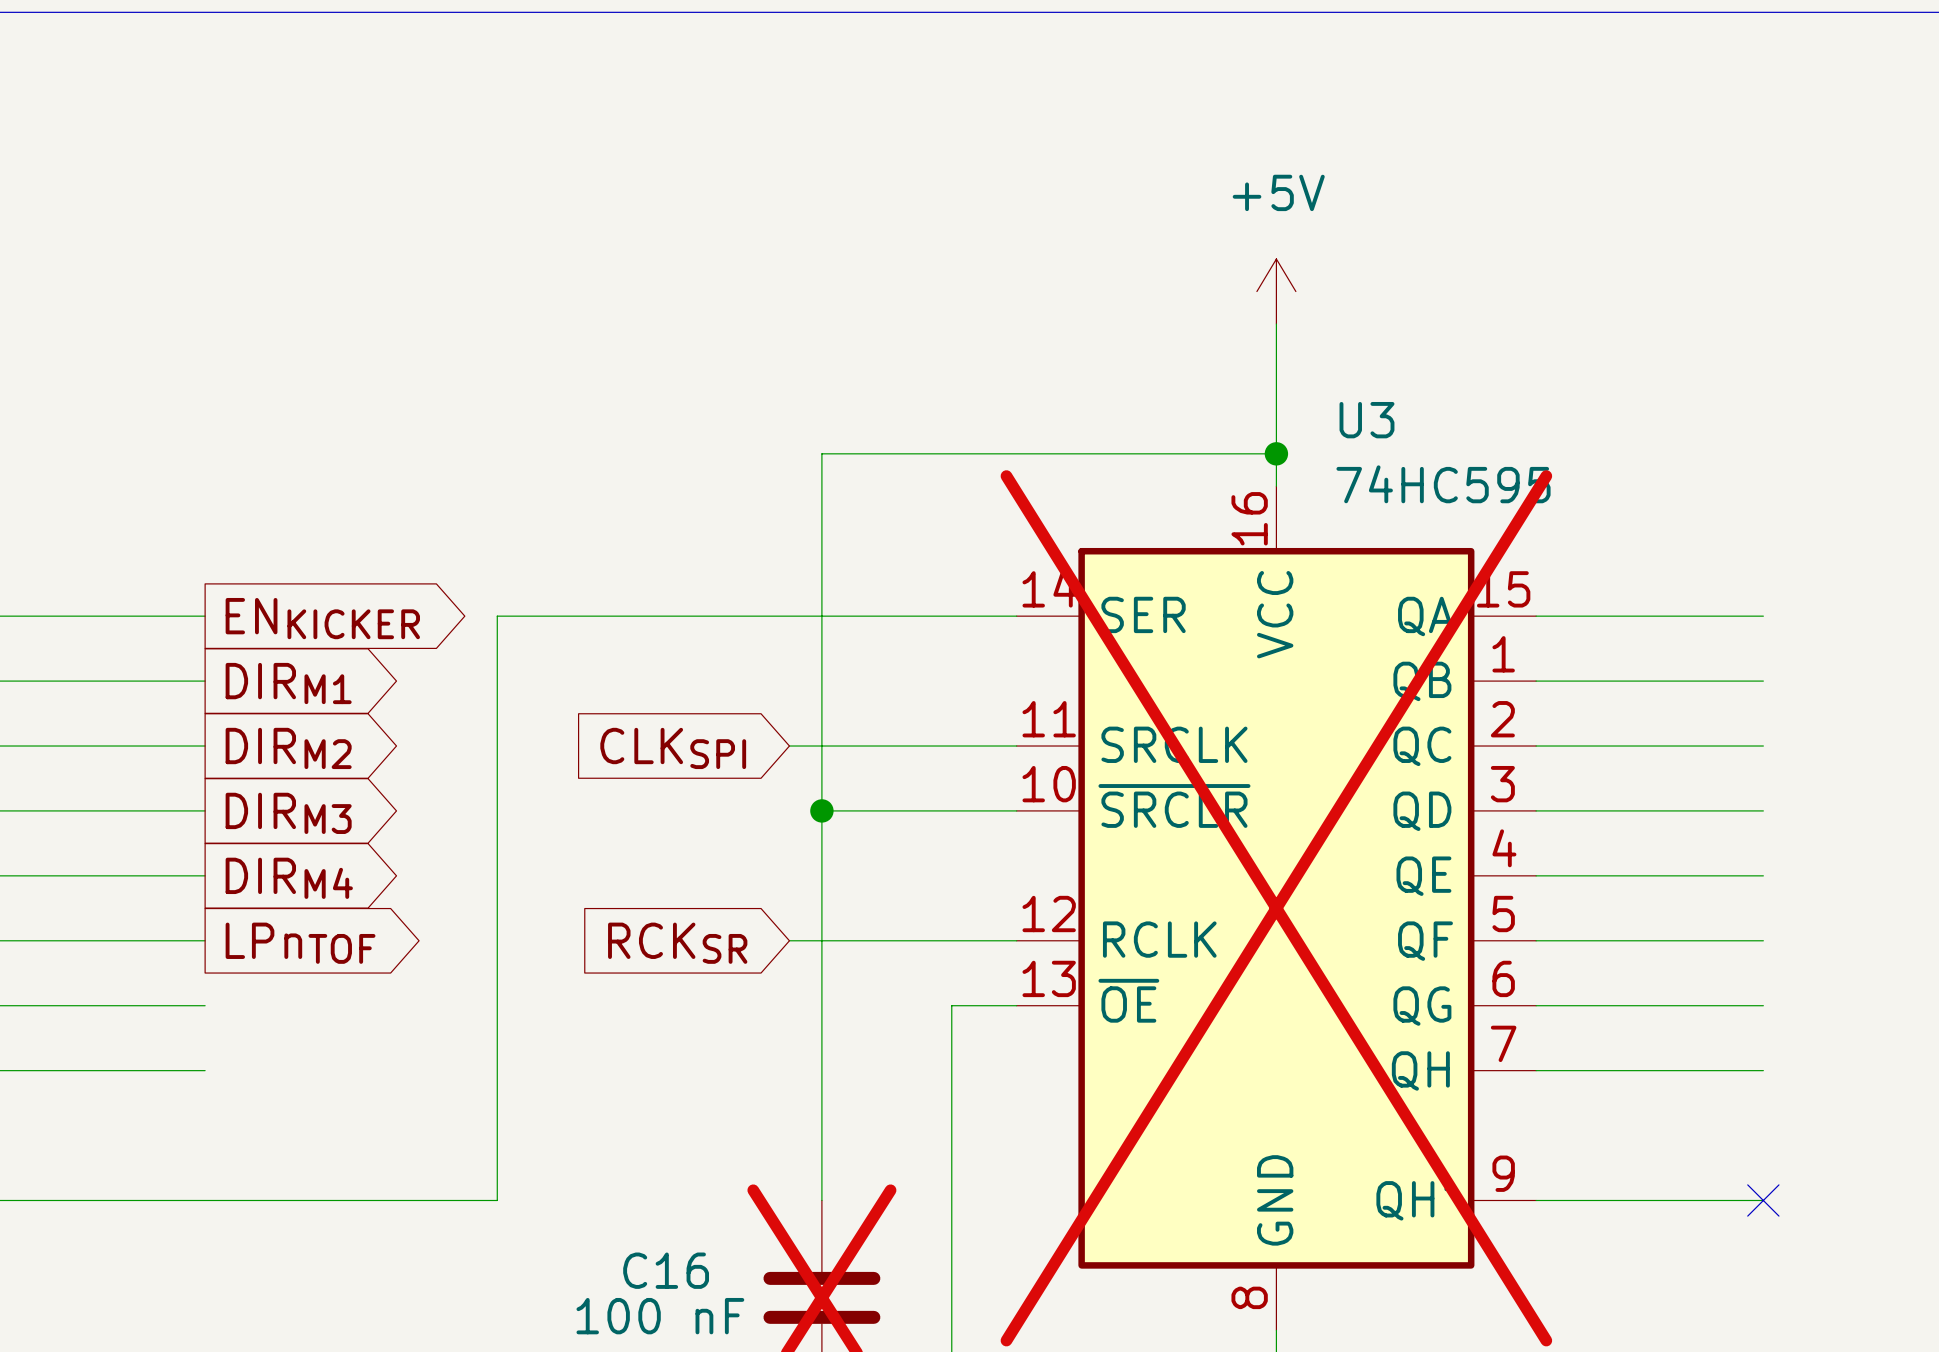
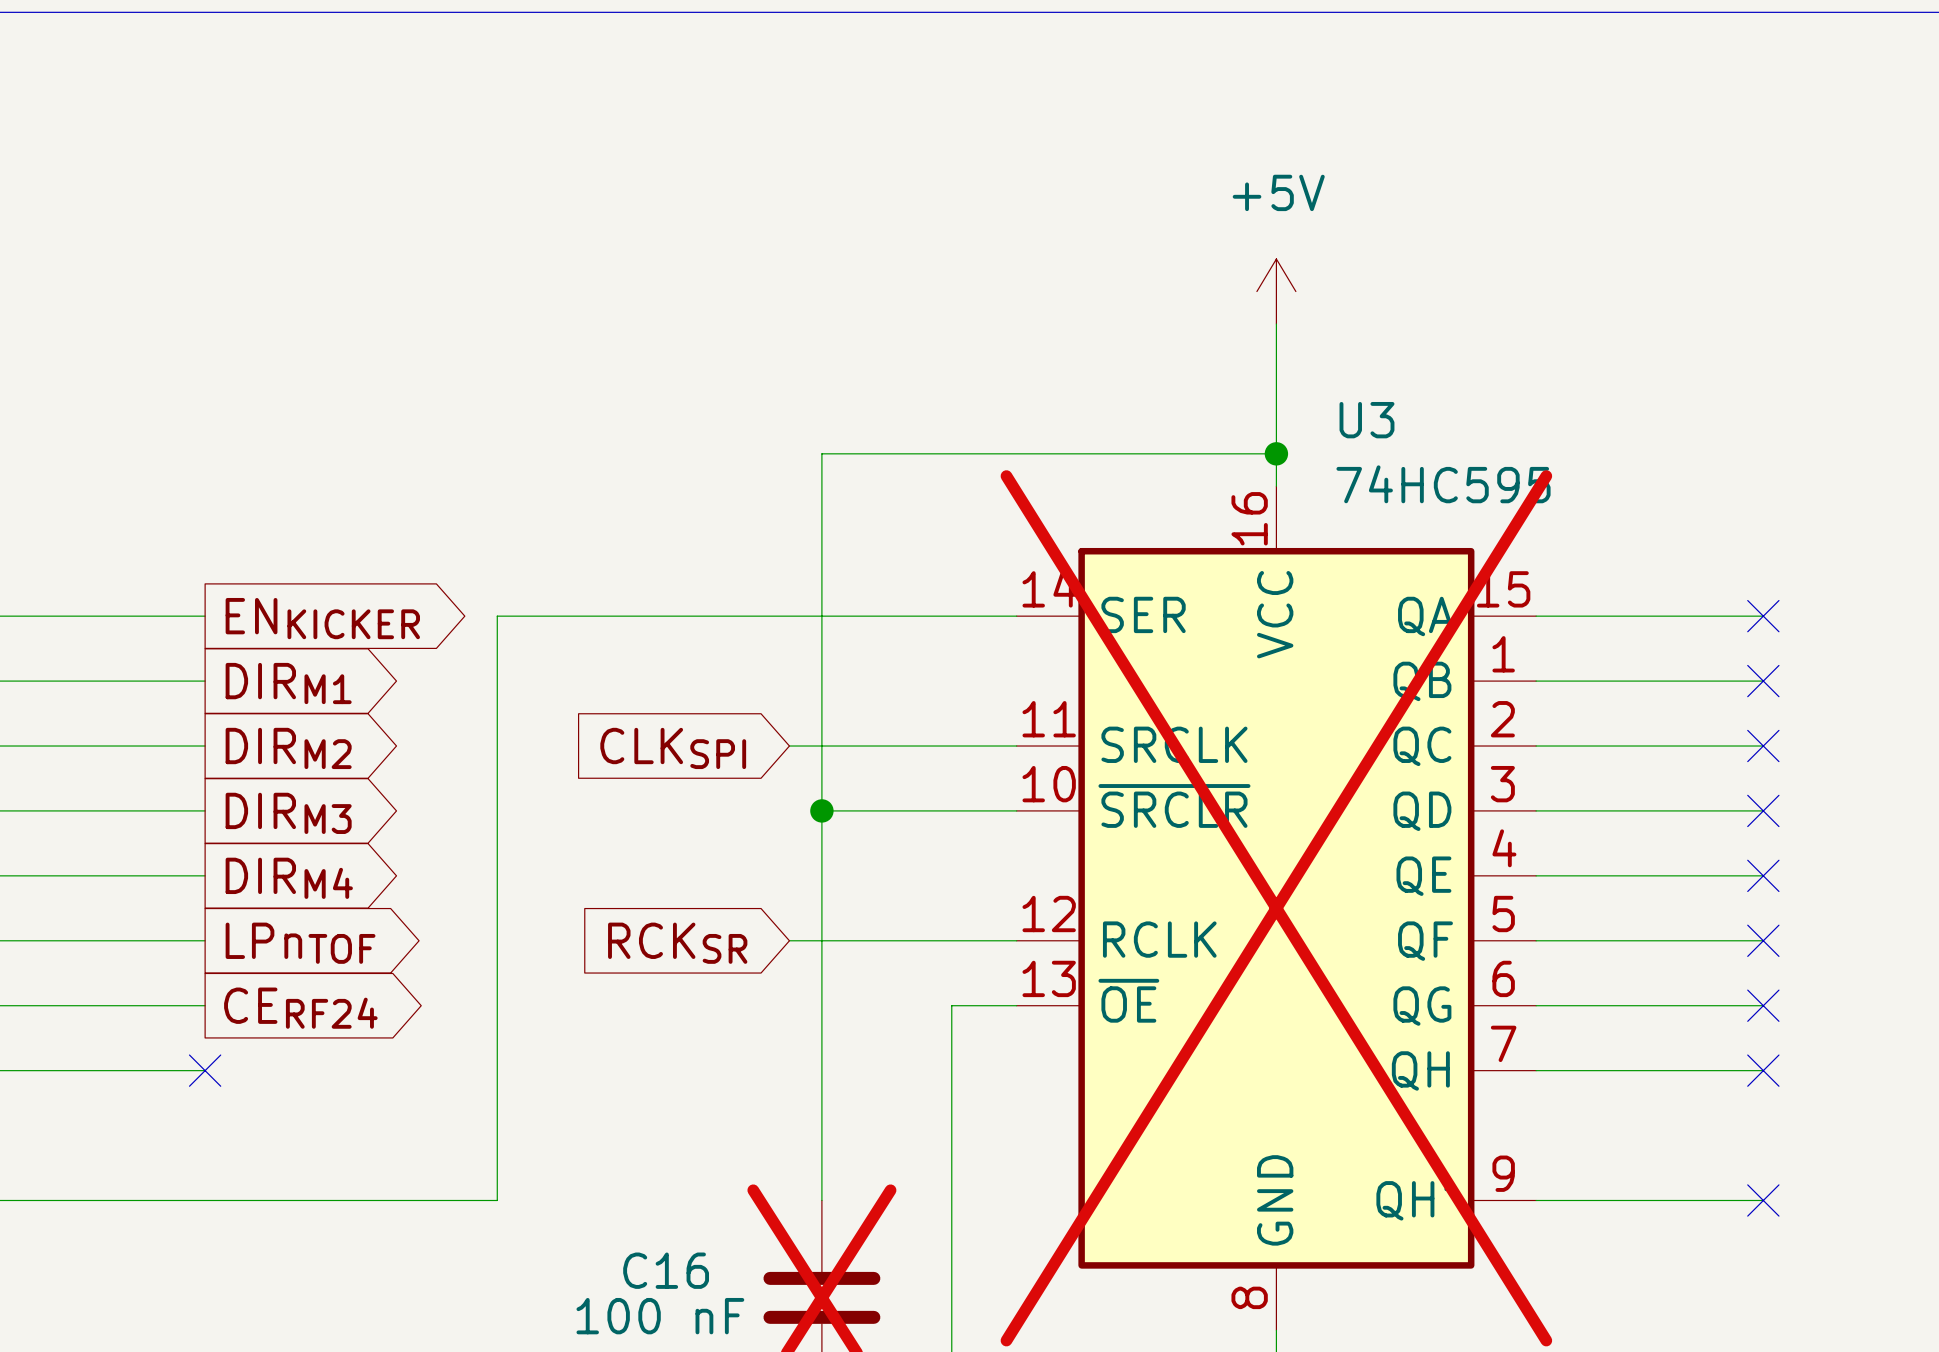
no-connect mark: none -> (1763, 616)
no-connect mark: none -> (1763, 681)
no-connect mark: none -> (1763, 746)
no-connect mark: none -> (1763, 810)
no-connect mark: none -> (1763, 875)
no-connect mark: none -> (1763, 940)
no-connect mark: none -> (1763, 1005)
global label: none -> CERF24 (300, 1008)
no-connect mark: none -> (205, 1070)
no-connect mark: none -> (1763, 1070)

